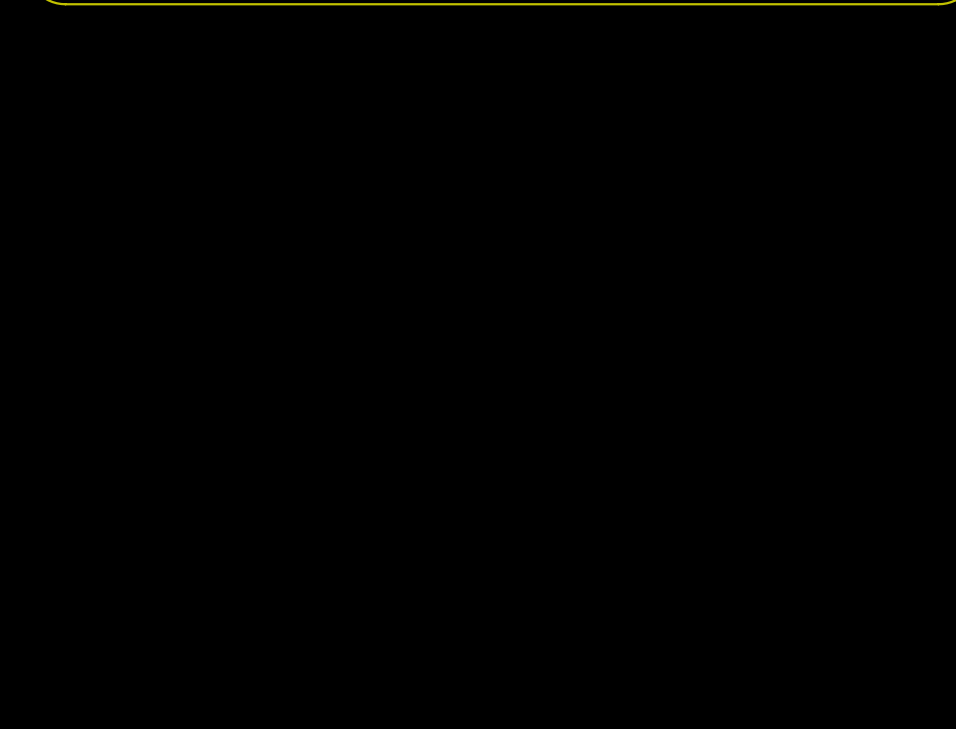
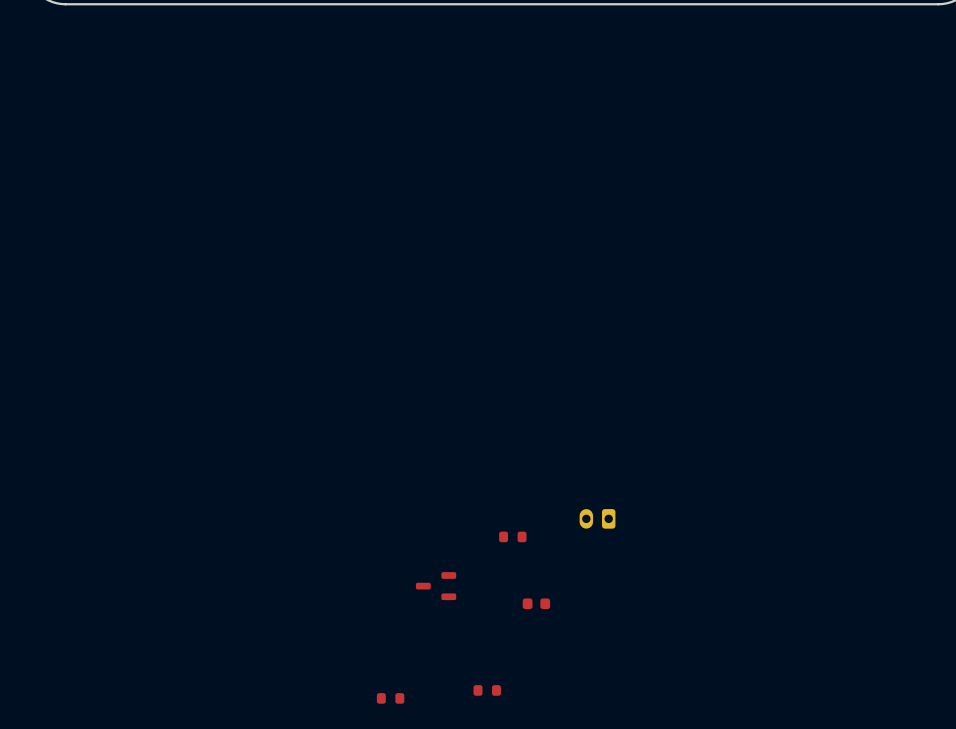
part: none -> (597, 518)
part: none -> (512, 536)
part: none -> (436, 586)
part: none -> (536, 603)
part: none -> (487, 690)
part: none -> (390, 698)

